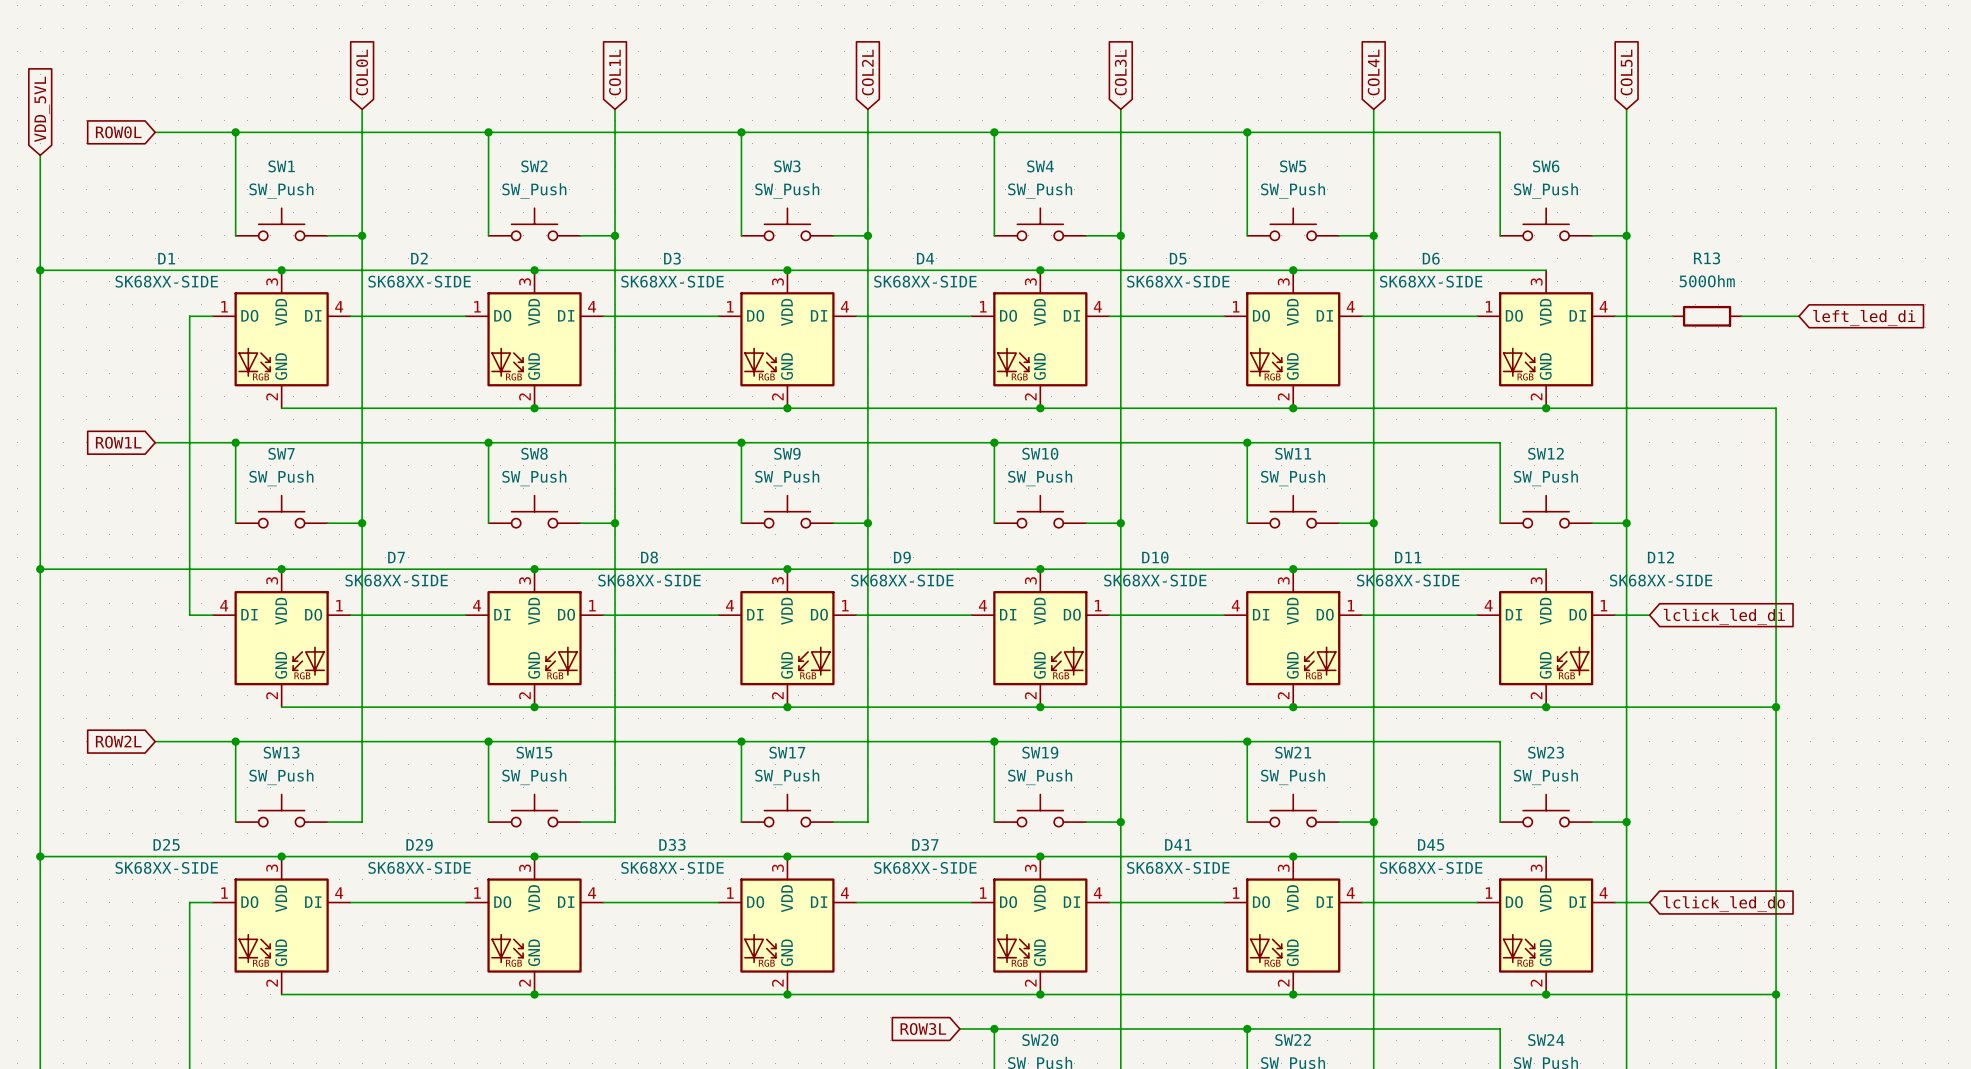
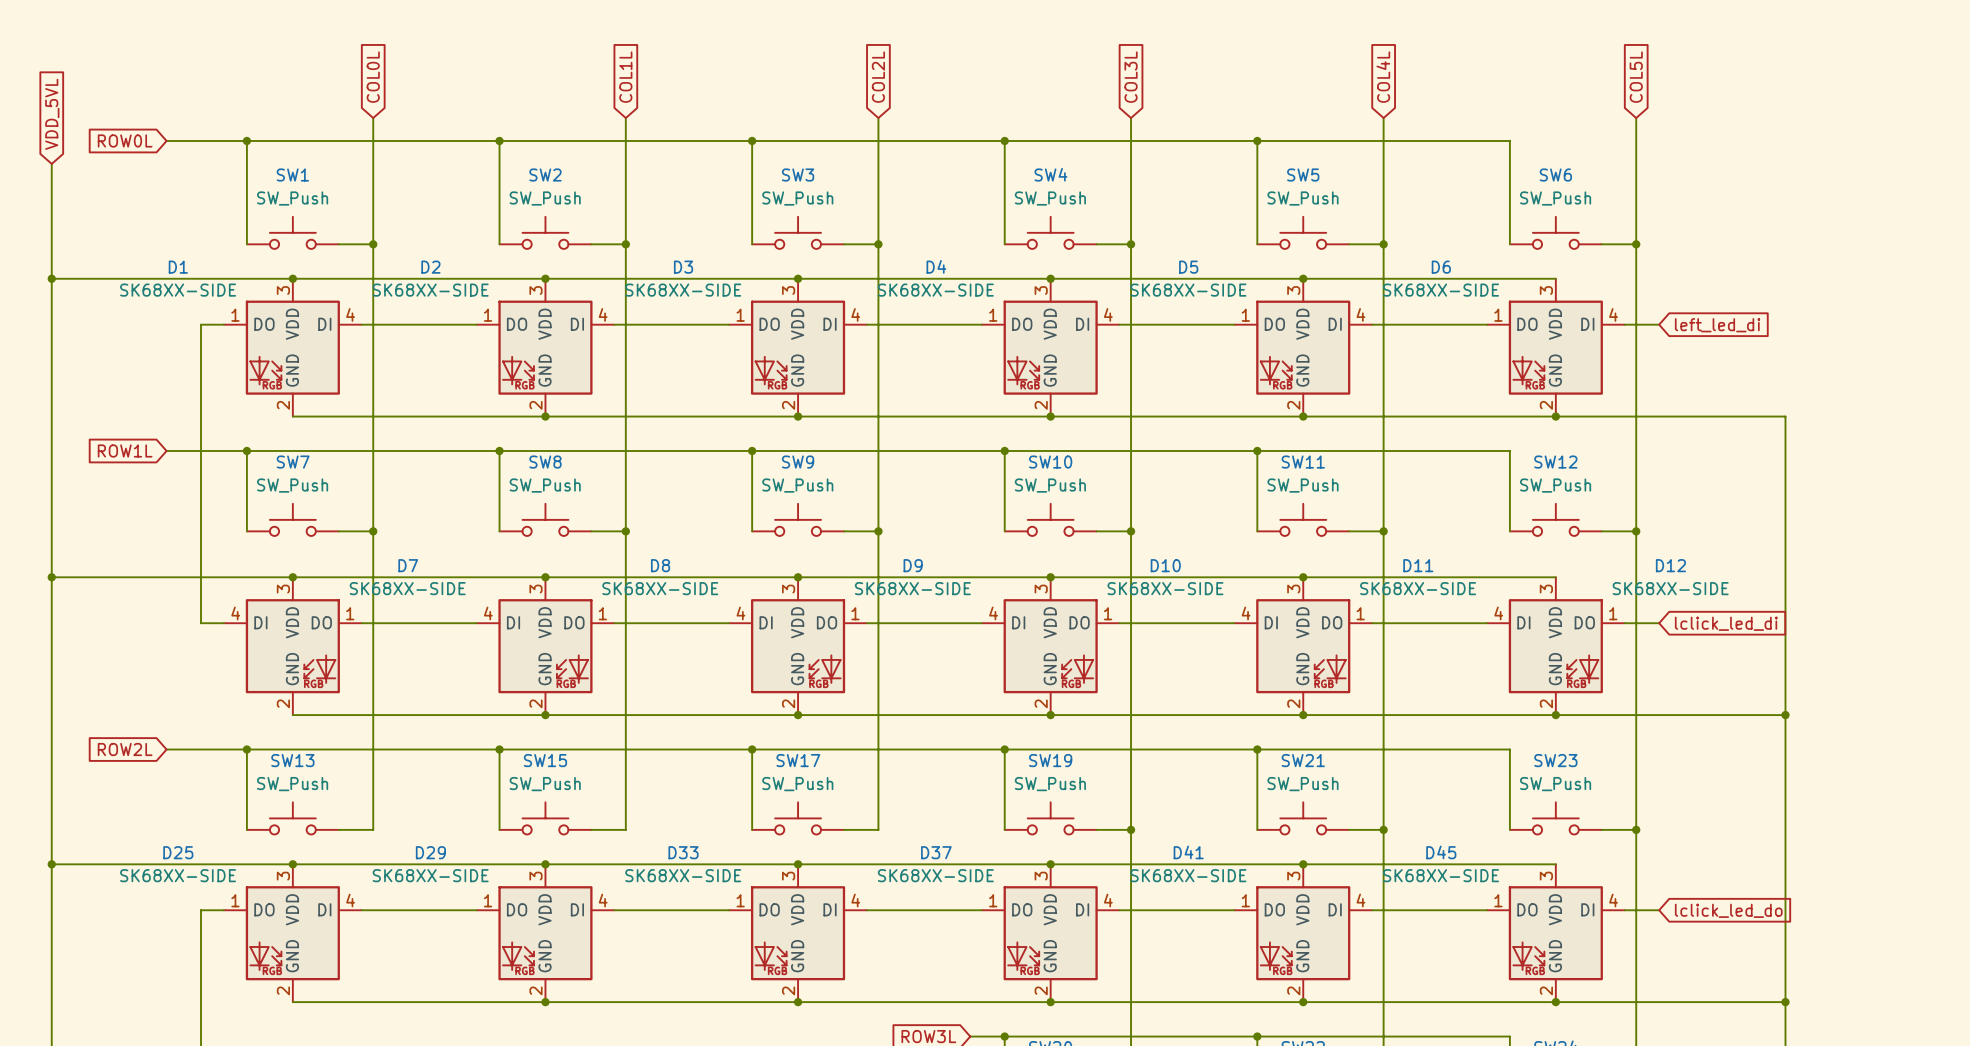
wire: (1649, 316) (1672, 316) -> none
R13: 500Ohm (1707, 316) -> none
wire: (1741, 316) (1799, 316) -> none
global label position: left_led_di (1864, 317) -> left_led_di (1717, 325)

